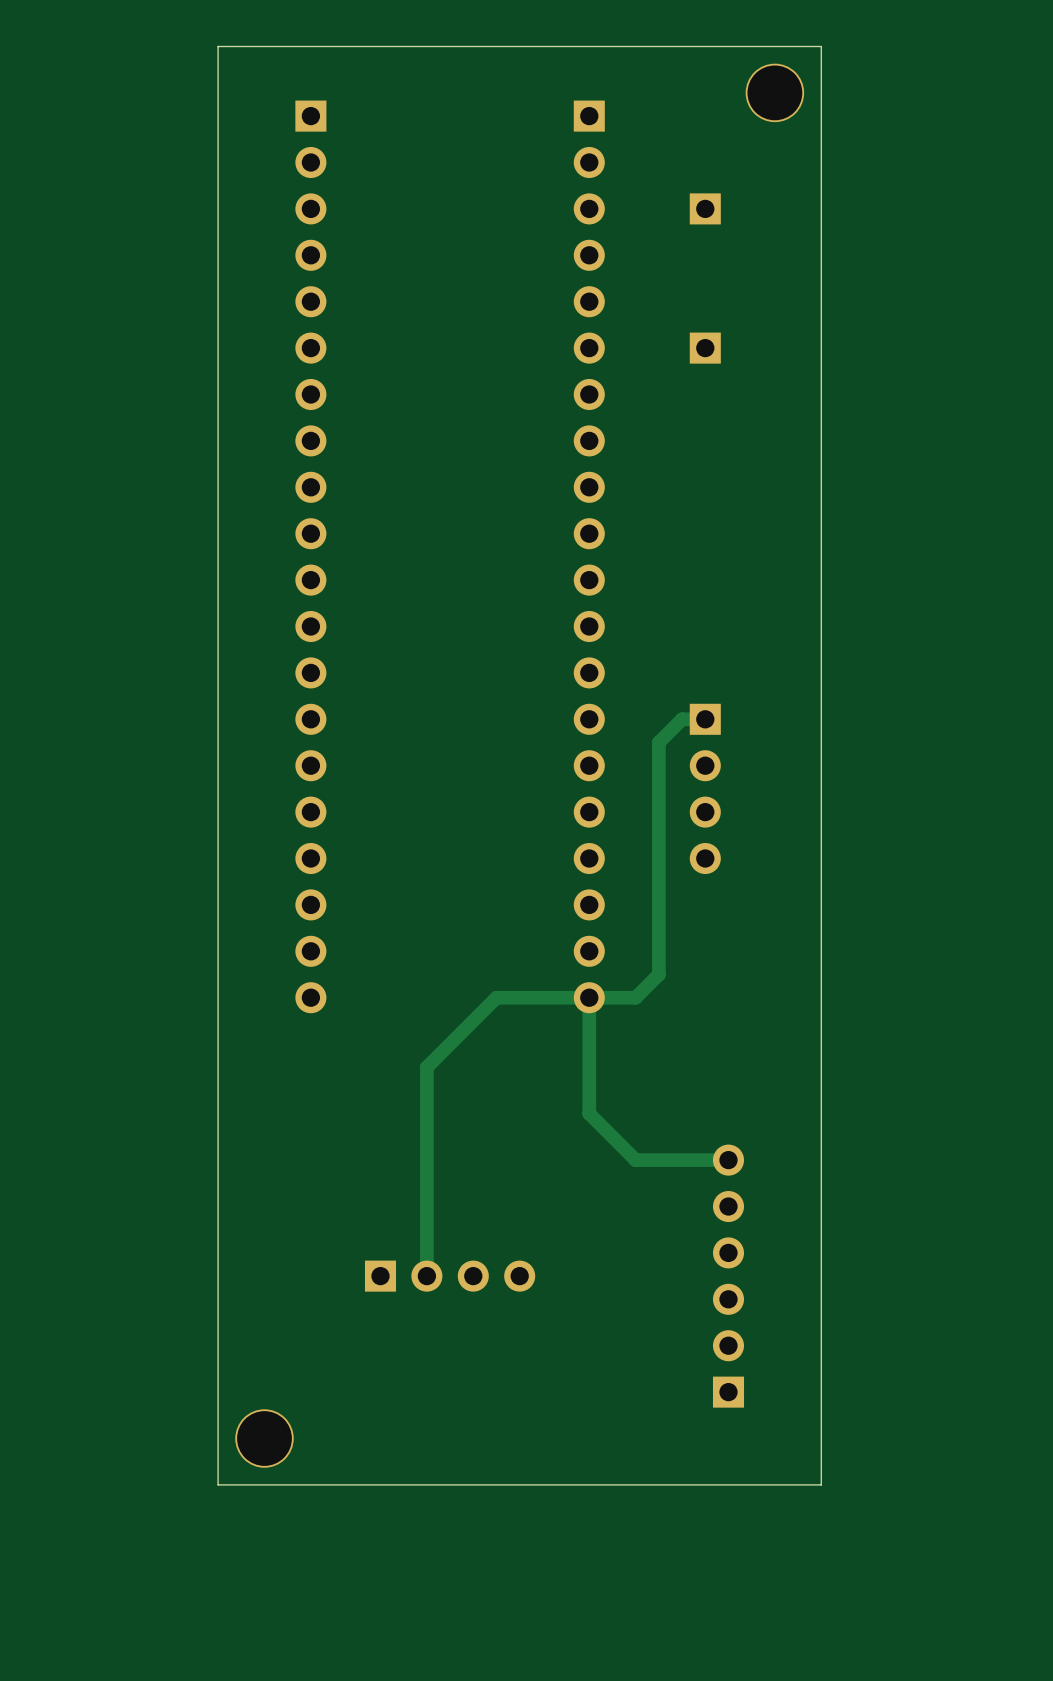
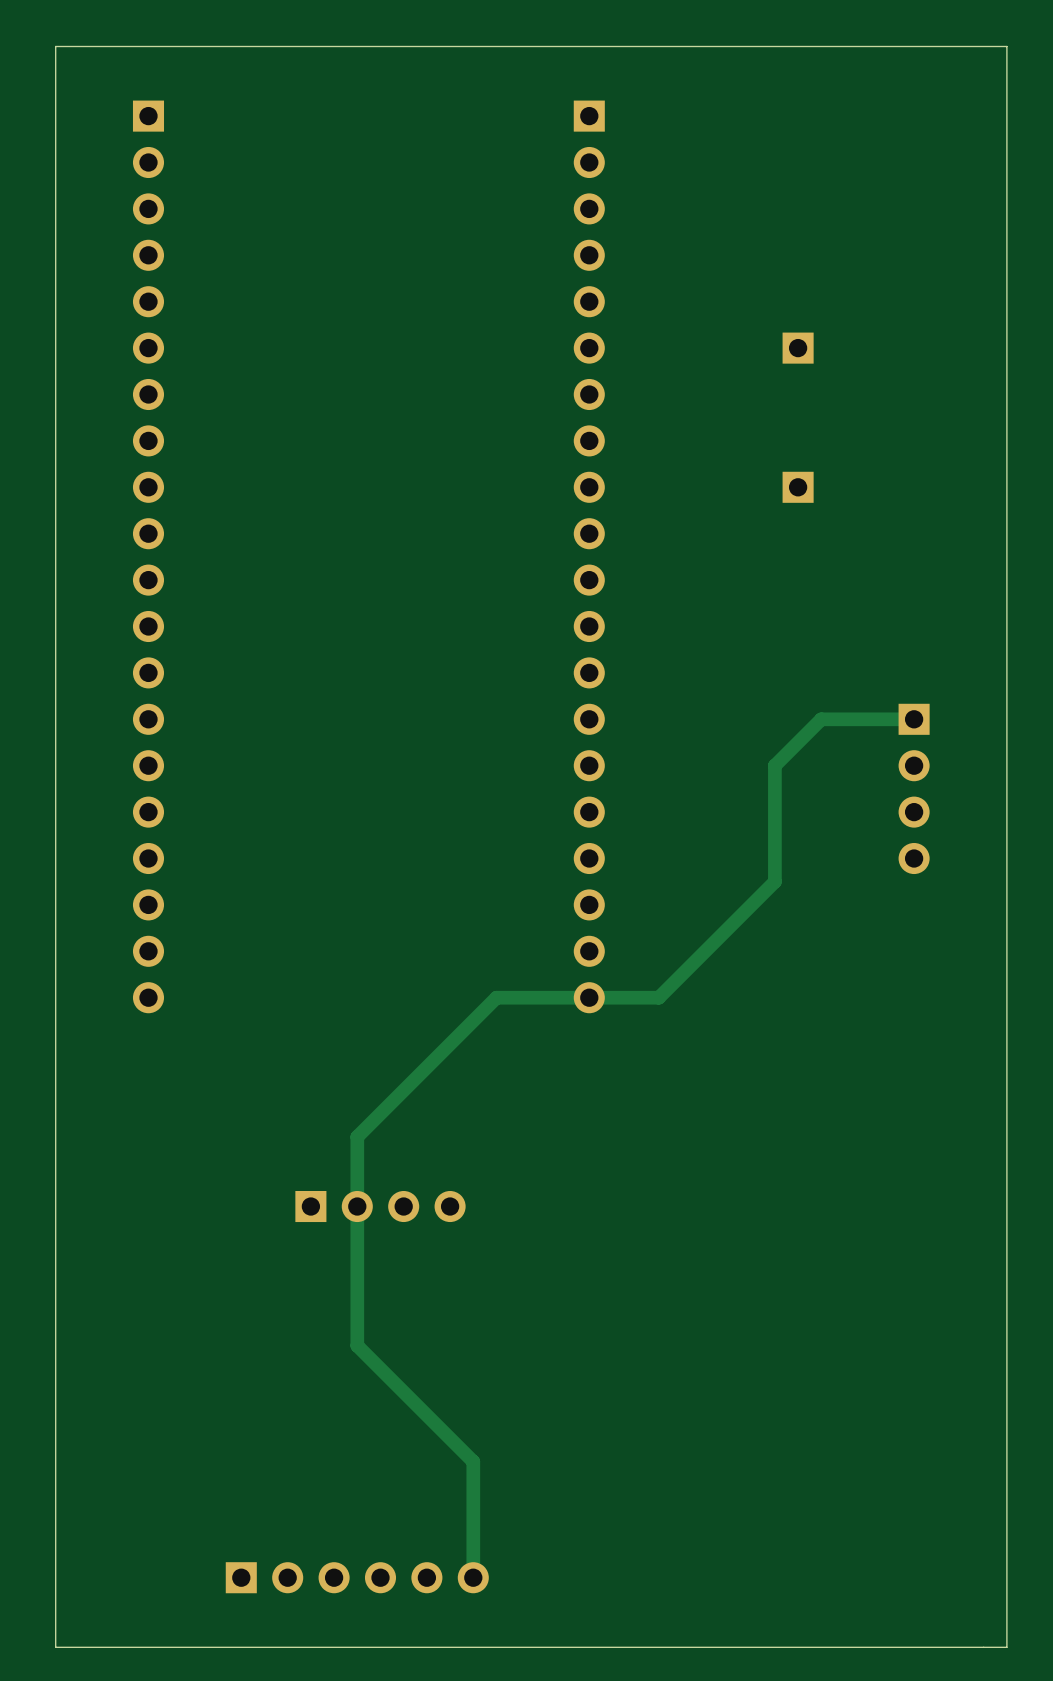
board edge: (821, 46) (821, 1484) (218, 1484) (218, 46) -> (821, 46) (1006, 46) (1006, 1647) (55, 1647) (55, 46) (218, 46)
part: (774, 92) -> none
part: (705, 208) -> none
part: (705, 348) -> none
part: none -> (798, 348)
part: none -> (798, 487)
part position: (310, 556) -> (148, 556)
track: (705, 719) (682, 719) (658, 742) (658, 974) (635, 997) -> (914, 719) (821, 719) (774, 765) (774, 881) (658, 997) (635, 997)
part position: (705, 788) -> (914, 788)
track: (589, 997) (589, 1113) (635, 1160) (728, 1160) -> none
track: (426, 1067) (426, 1276) -> (426, 1067) (357, 1136) (357, 1345) (473, 1461) (473, 1577)
part position: (450, 1276) -> (380, 1206)
part: (728, 1276) -> none
part: (264, 1438) -> none
part: none -> (357, 1577)

